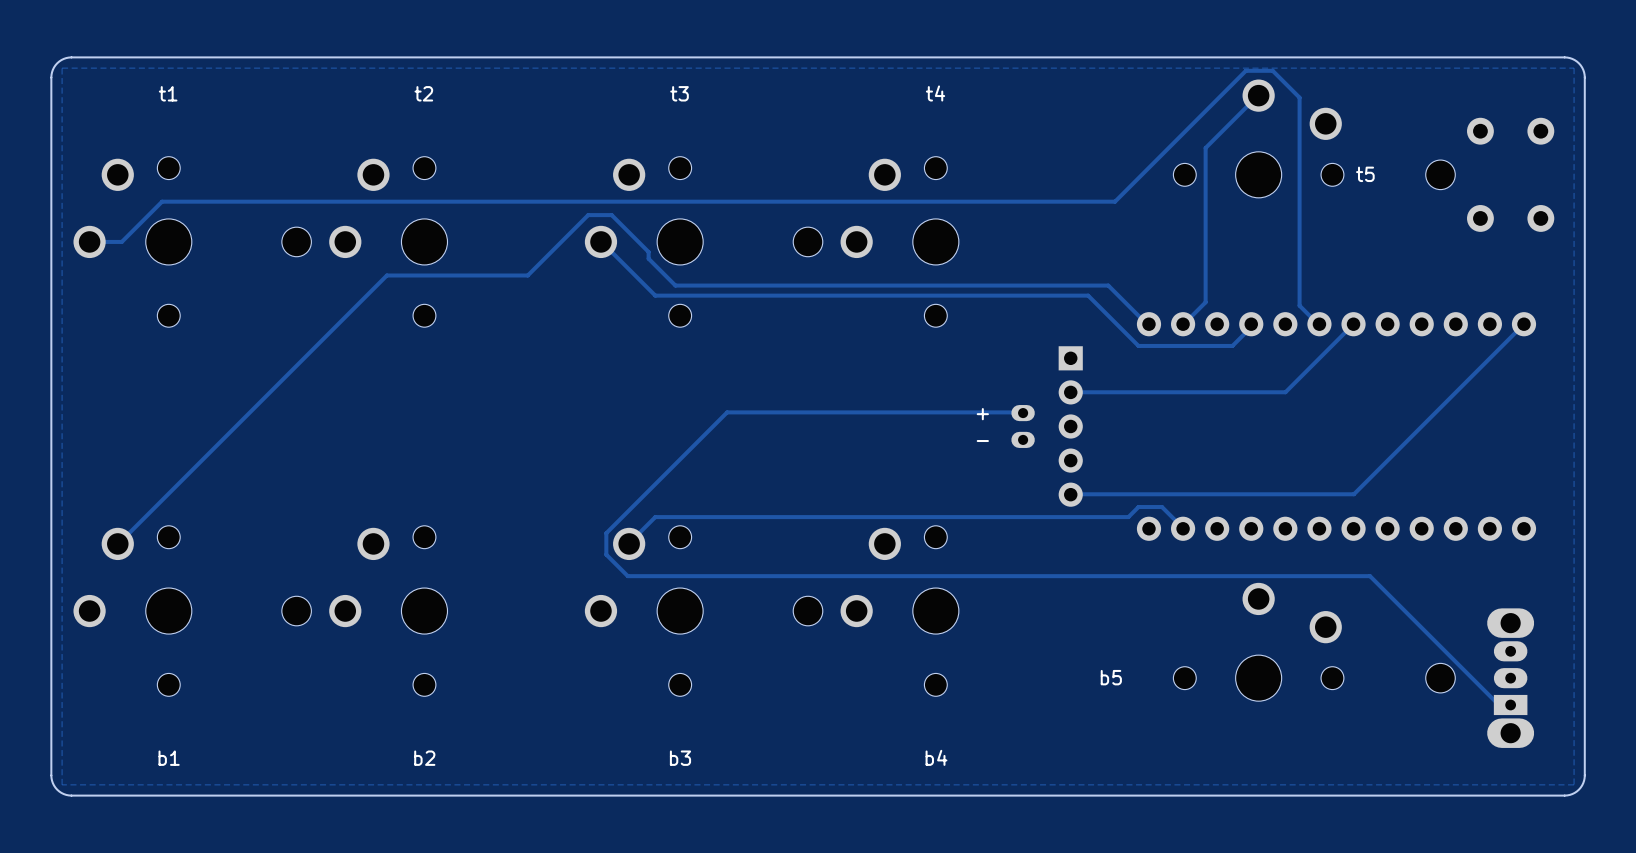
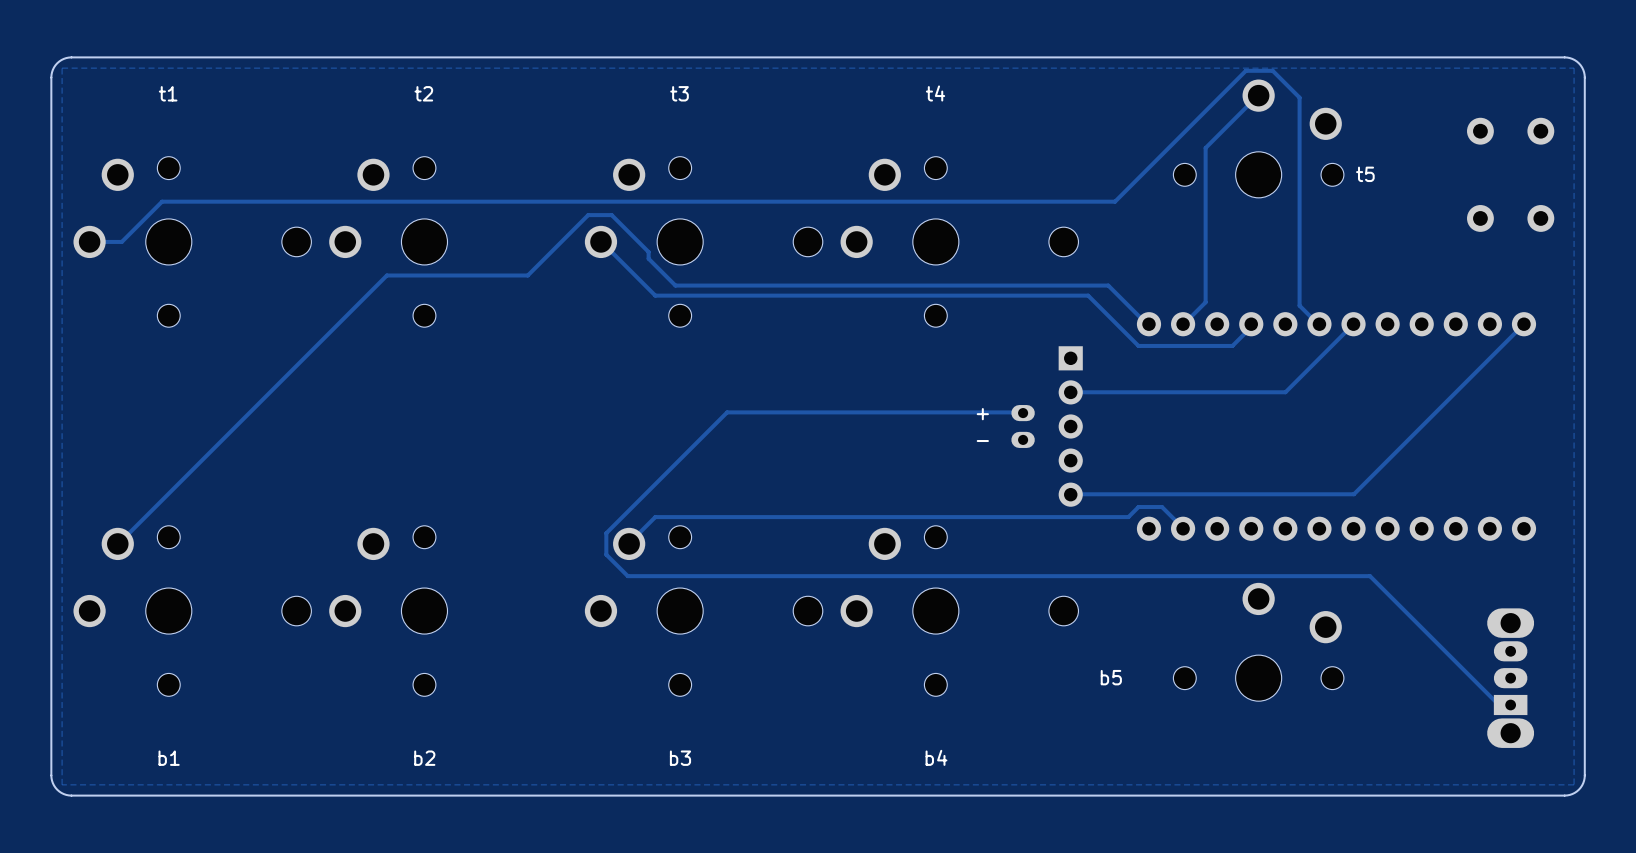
part: (1440, 174) -> none
part: none -> (1063, 241)
part: none -> (1063, 611)
part: (1440, 678) -> none

